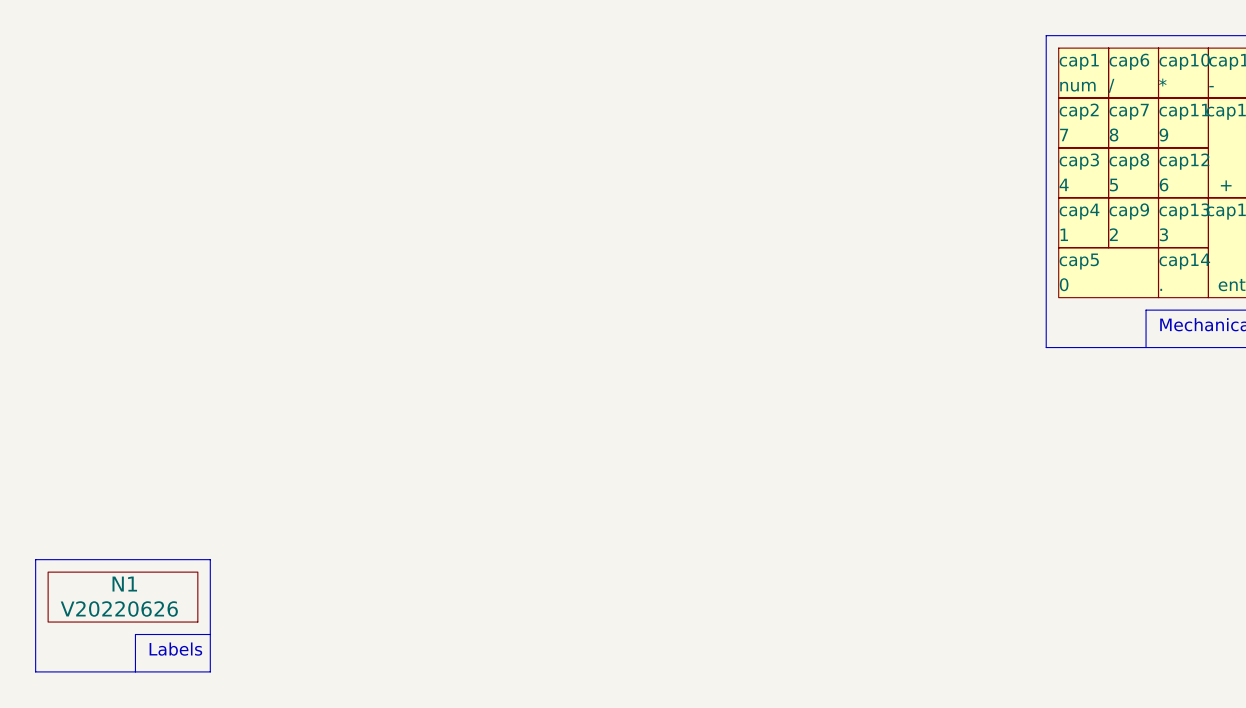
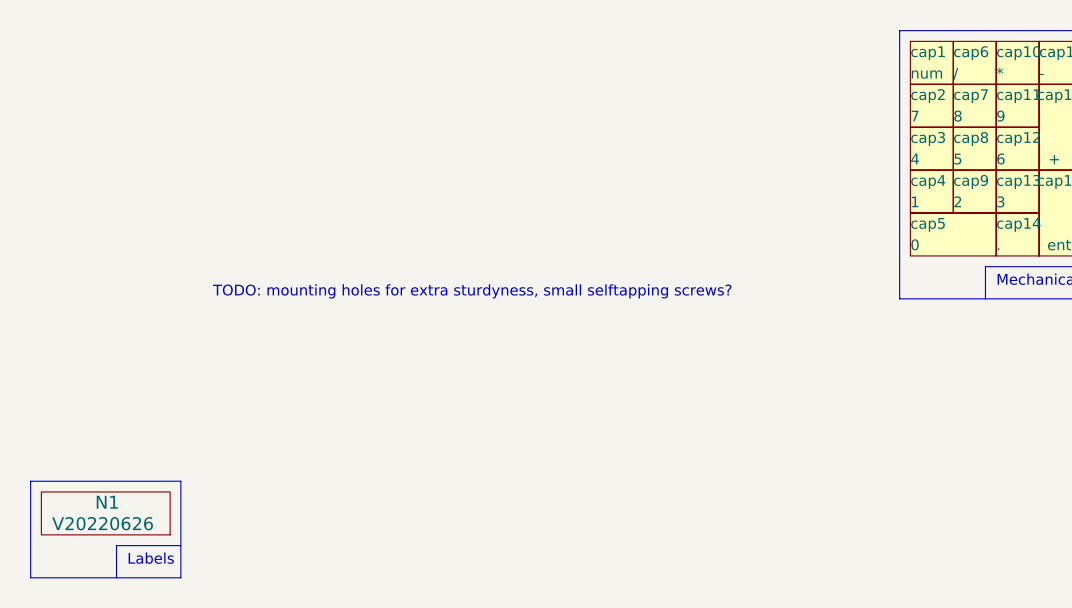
text: none -> TODO: mounting holes for extra sturdyness, small selftapping screws? (472, 291)

